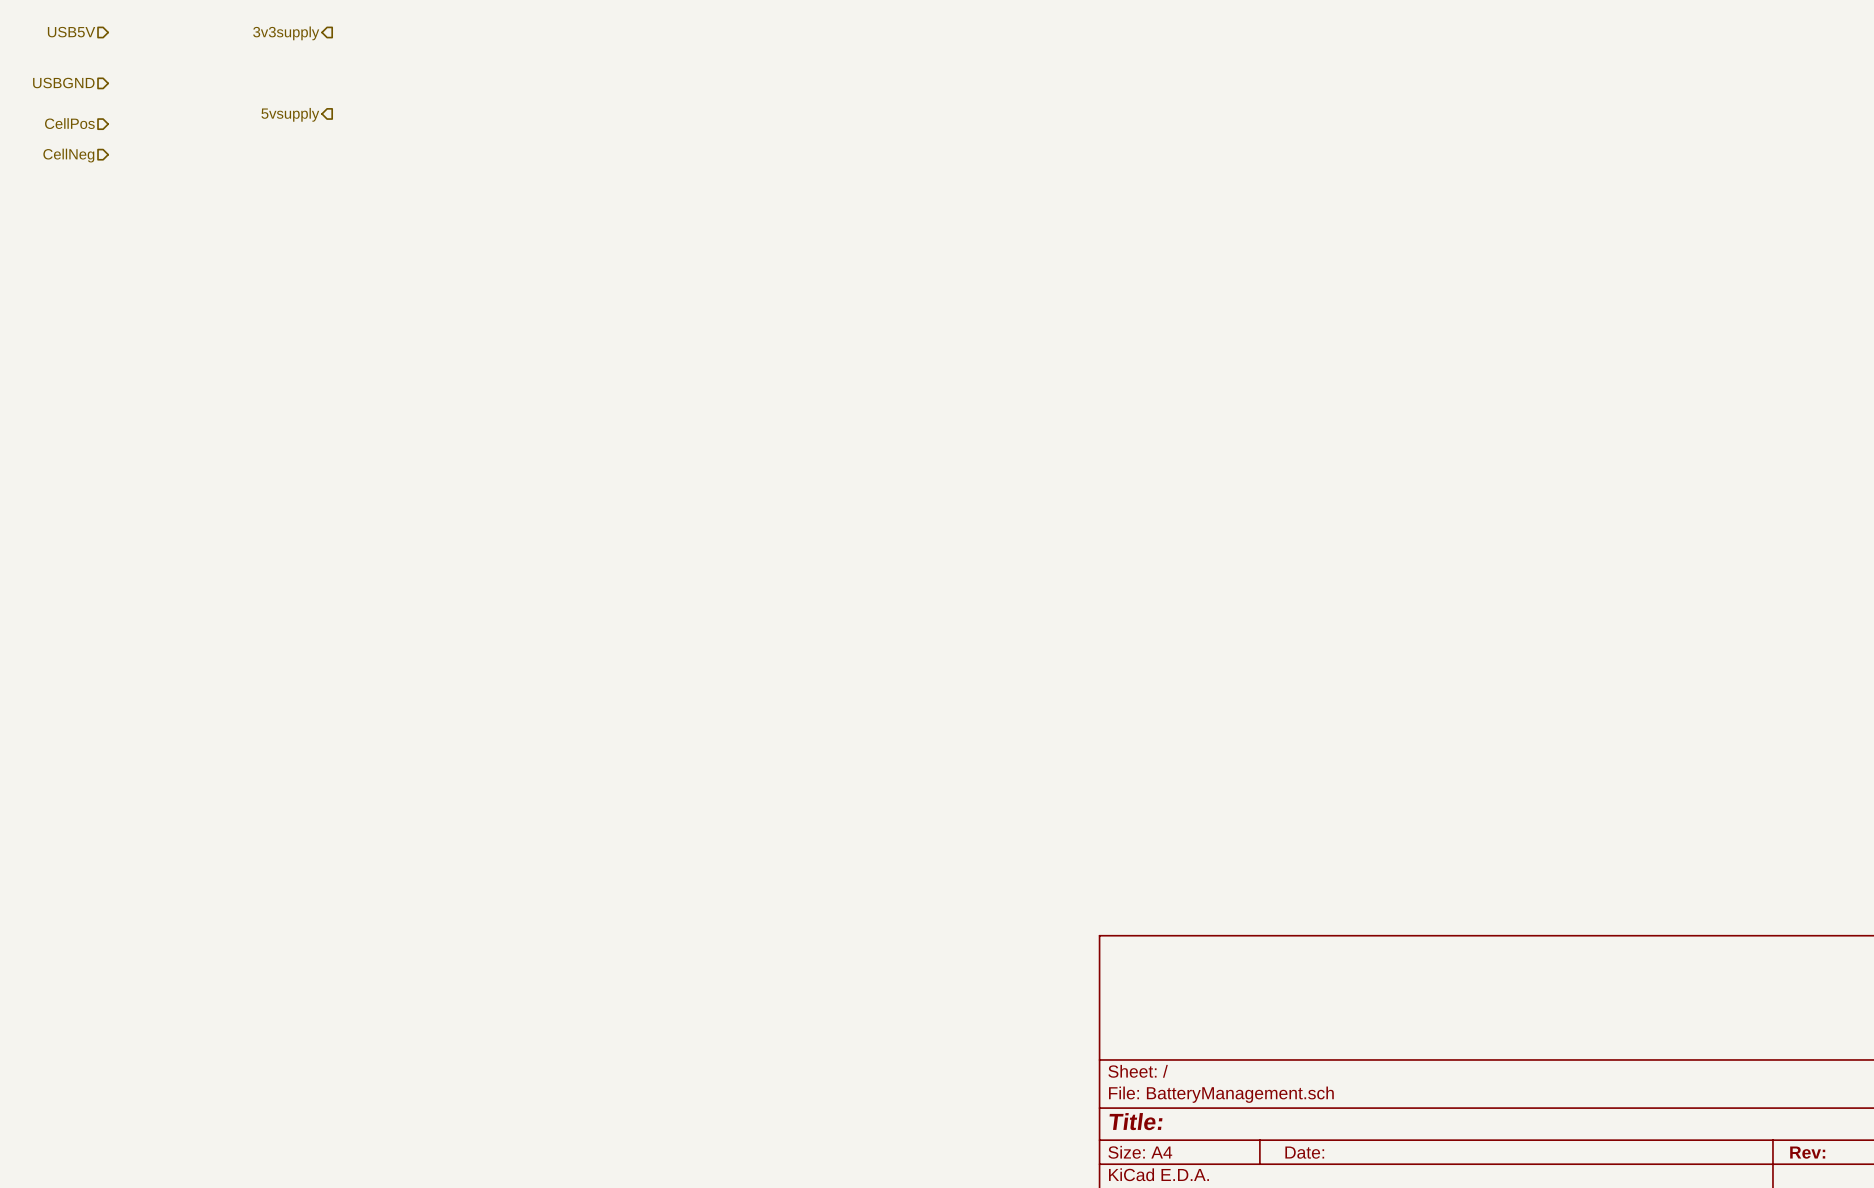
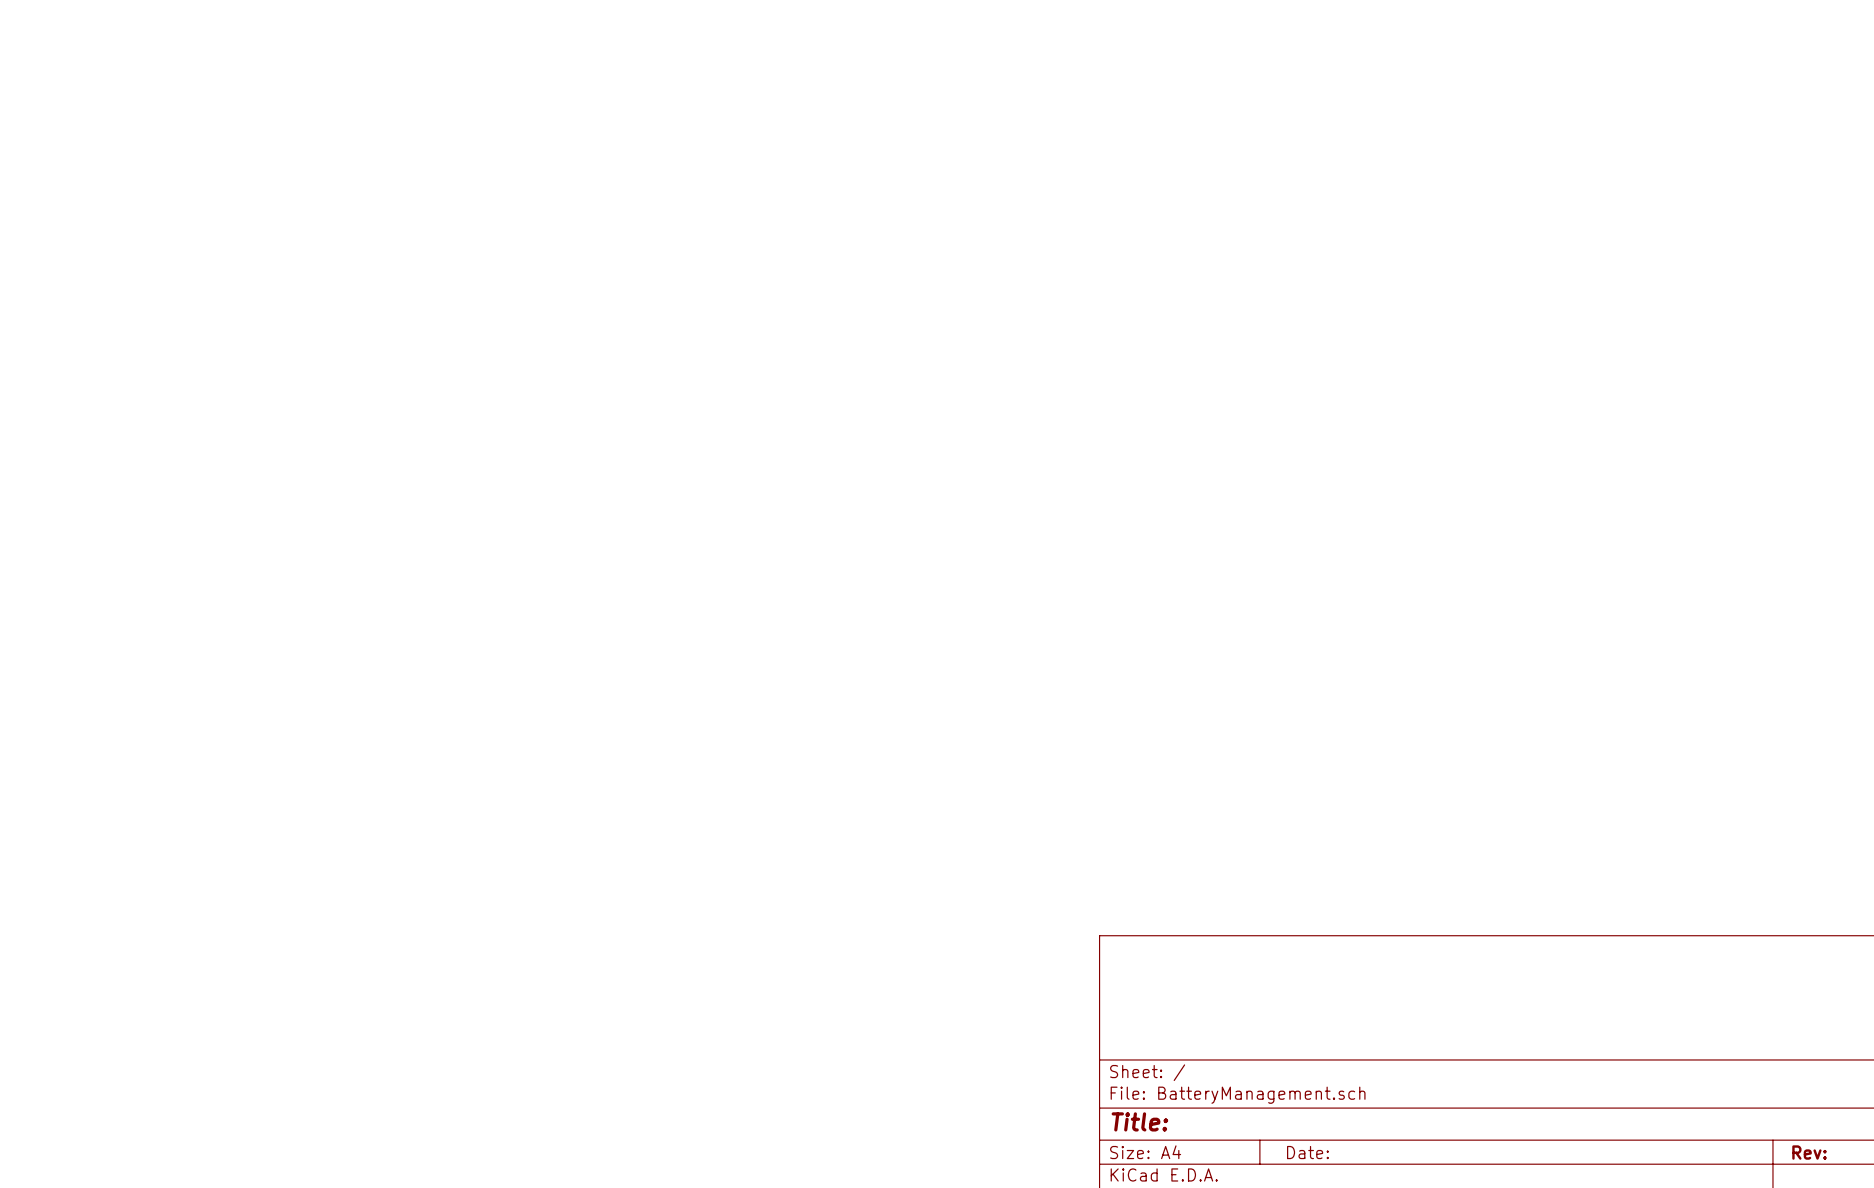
hierarchical label: USB5V (71, 32) -> none
hierarchical label: 3v3supply (286, 33) -> none
hierarchical label: USBGND (63, 83) -> none
hierarchical label: 5vsupply (290, 114) -> none
hierarchical label: CellPos (69, 123) -> none
hierarchical label: CellNeg (68, 155) -> none

